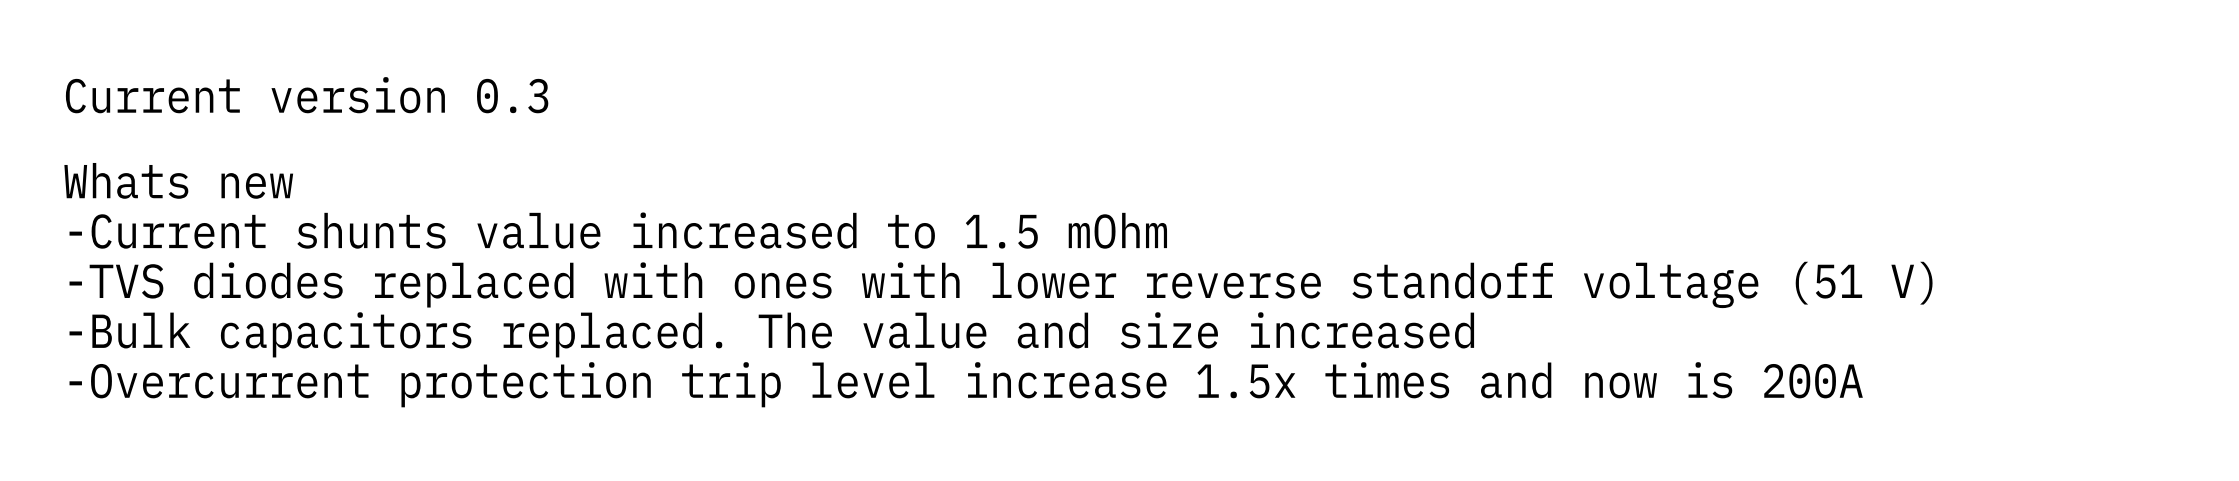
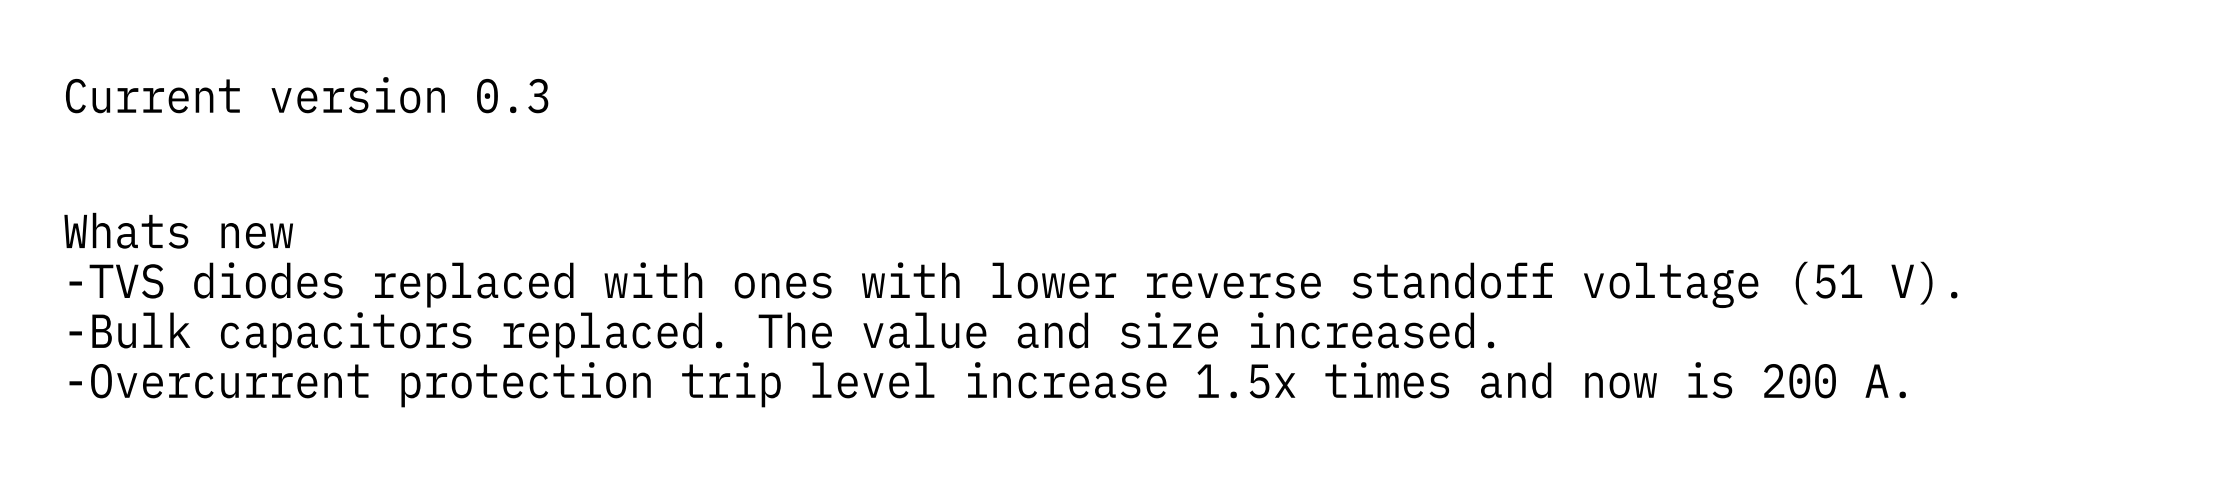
text: Whats new (178, 180) -> none
text: -Current shunts value increased to 1.5 mOhm (618, 230) -> Whats new (178, 230)
text: -TVS diodes replaced with ones with lower reverse standoff voltage (51 V) (1001, 284) -> -TVS diodes replaced with ones with lower reverse standoff voltage (51 V). (1013, 284)
text: -Bulk capacitors replaced. The value and size increased (771, 334) -> -Bulk capacitors replaced. The value and size increased. (781, 334)
text: -Overcurrent protection trip level increase 1.5x times and now is 200A (966, 384) -> -Overcurrent protection trip level increase 1.5x times and now is 200 A. (987, 384)

